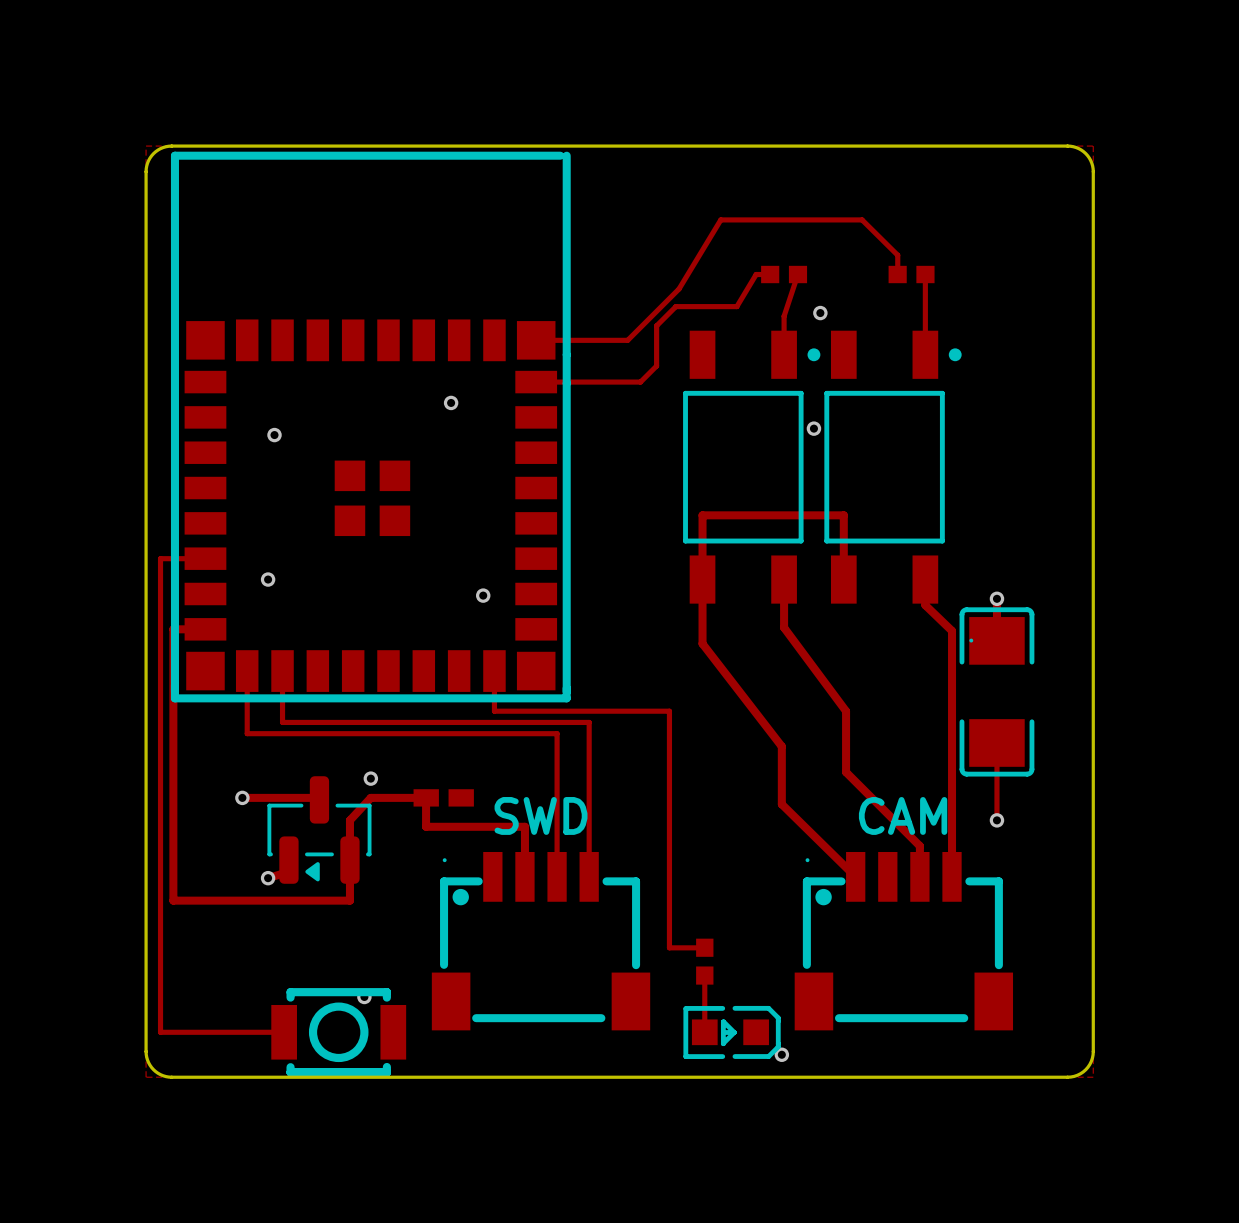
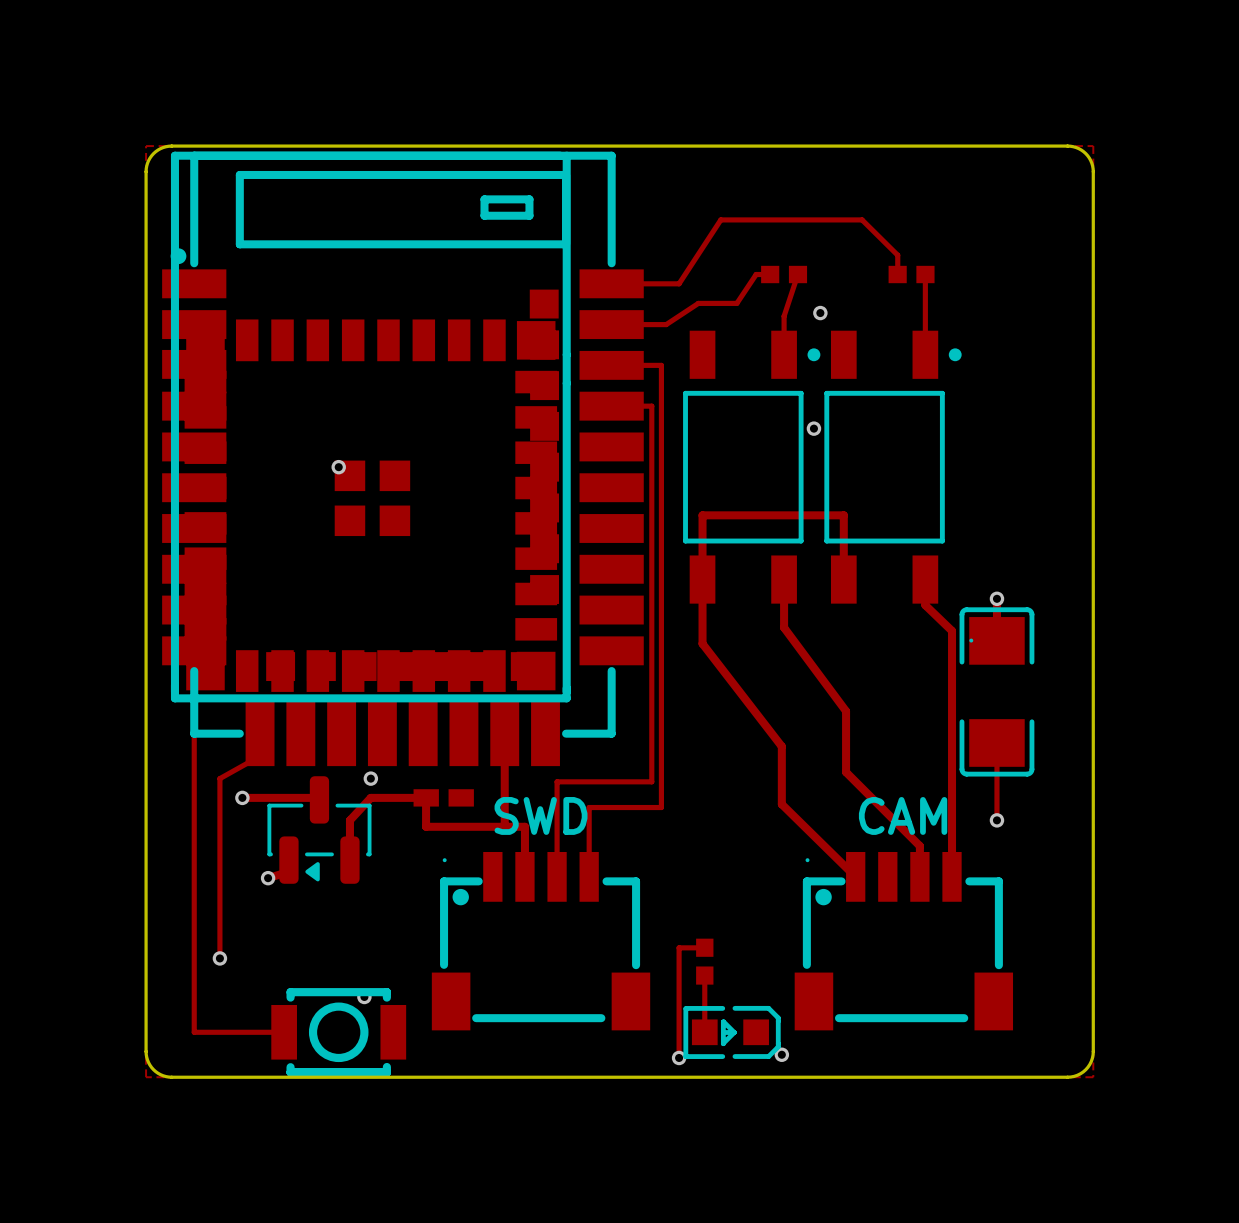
track: (720, 219) (679, 288) (627, 340) (536, 340) -> (720, 219) (679, 283) (611, 283)
track: (756, 274) (736, 306) (675, 306) (656, 325) (656, 366) (640, 382) (536, 382) -> (756, 274) (736, 303) (698, 303) (666, 324) (611, 324)
via: (451, 402) -> none
via: (274, 435) -> none
part: none -> (402, 458)
via: none -> (338, 467)
track: (205, 558) (160, 558) (160, 1032) (194, 1032) -> (194, 650) (194, 1032)
via: (268, 579) -> none
via: (483, 595) -> none
track: (205, 629) (173, 629) (173, 900) (349, 900) (349, 860) -> none
track: (247, 671) (247, 733) (557, 733) (557, 781) -> (611, 406) (651, 406) (651, 781) (557, 781)
track: (282, 671) (282, 722) (589, 722) (589, 807) -> (611, 365) (661, 365) (661, 807) (589, 807)
track: (494, 671) (494, 711) (669, 711) (669, 947) (679, 947) -> (679, 1057) (679, 947)
track: none -> (260, 733) (260, 756) (219, 778) (219, 958)
track: none -> (504, 733) (504, 826)
via: none -> (219, 958)
via: none -> (679, 1057)

